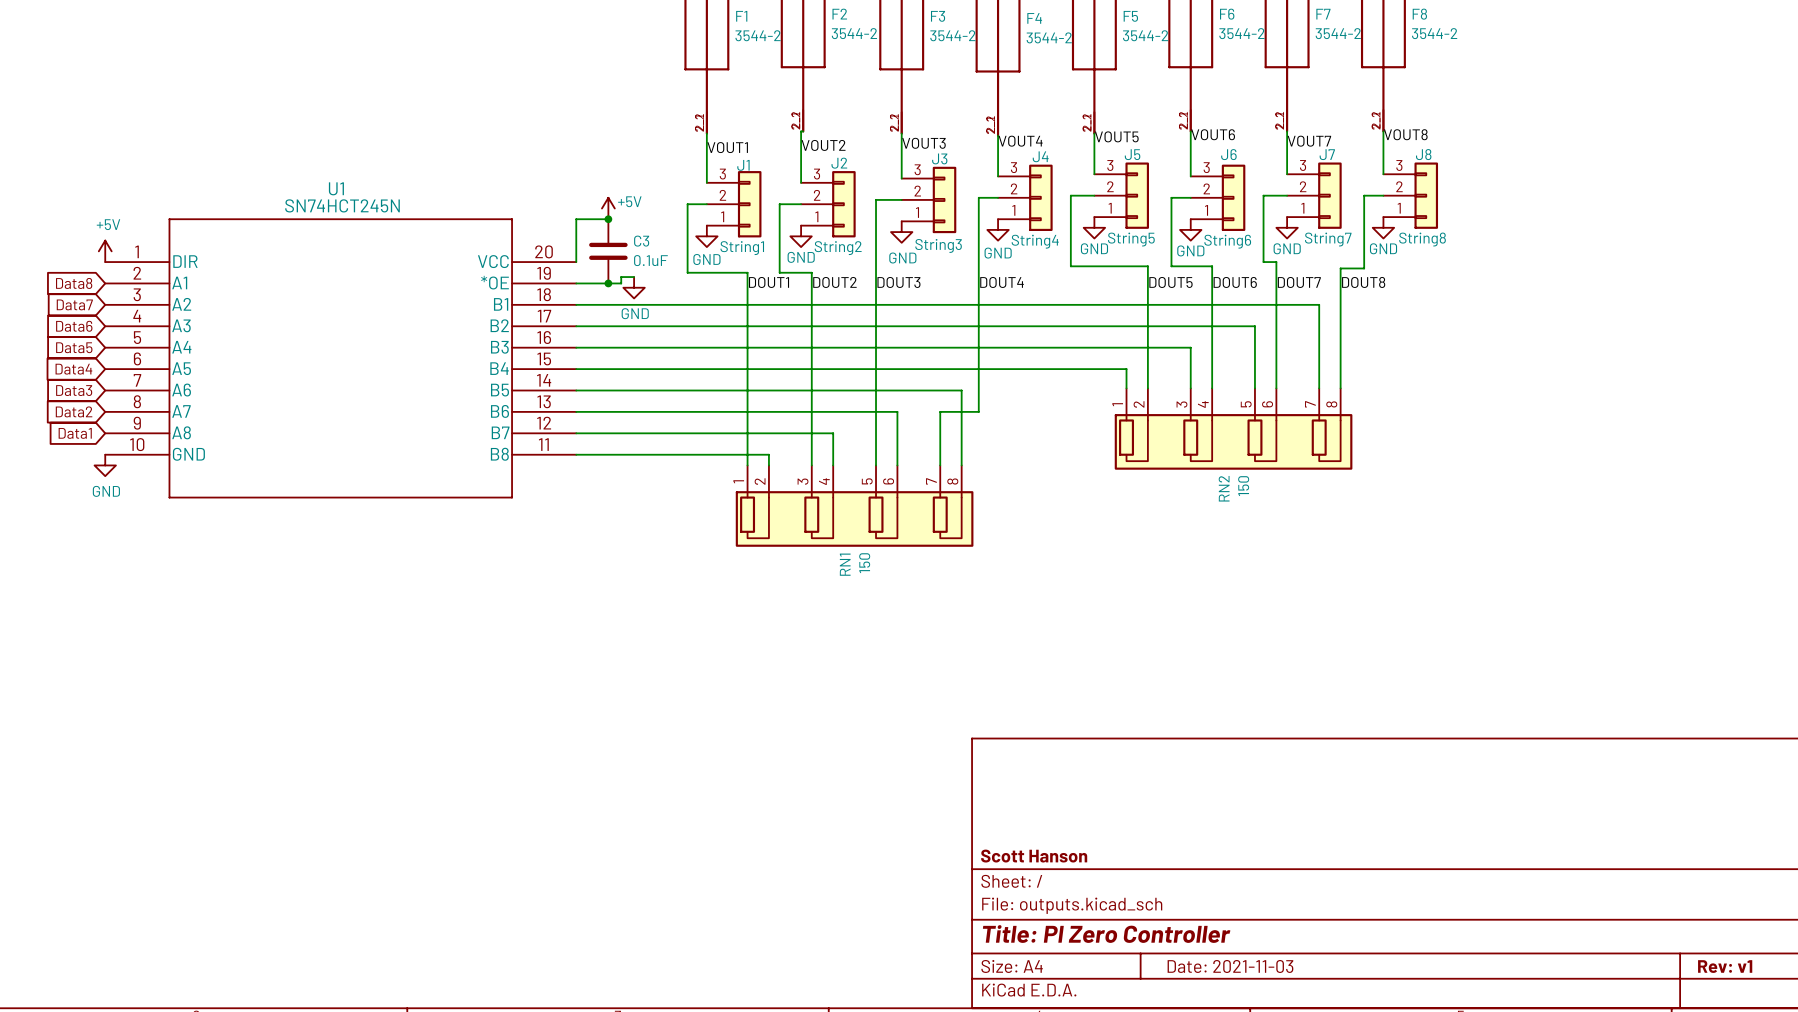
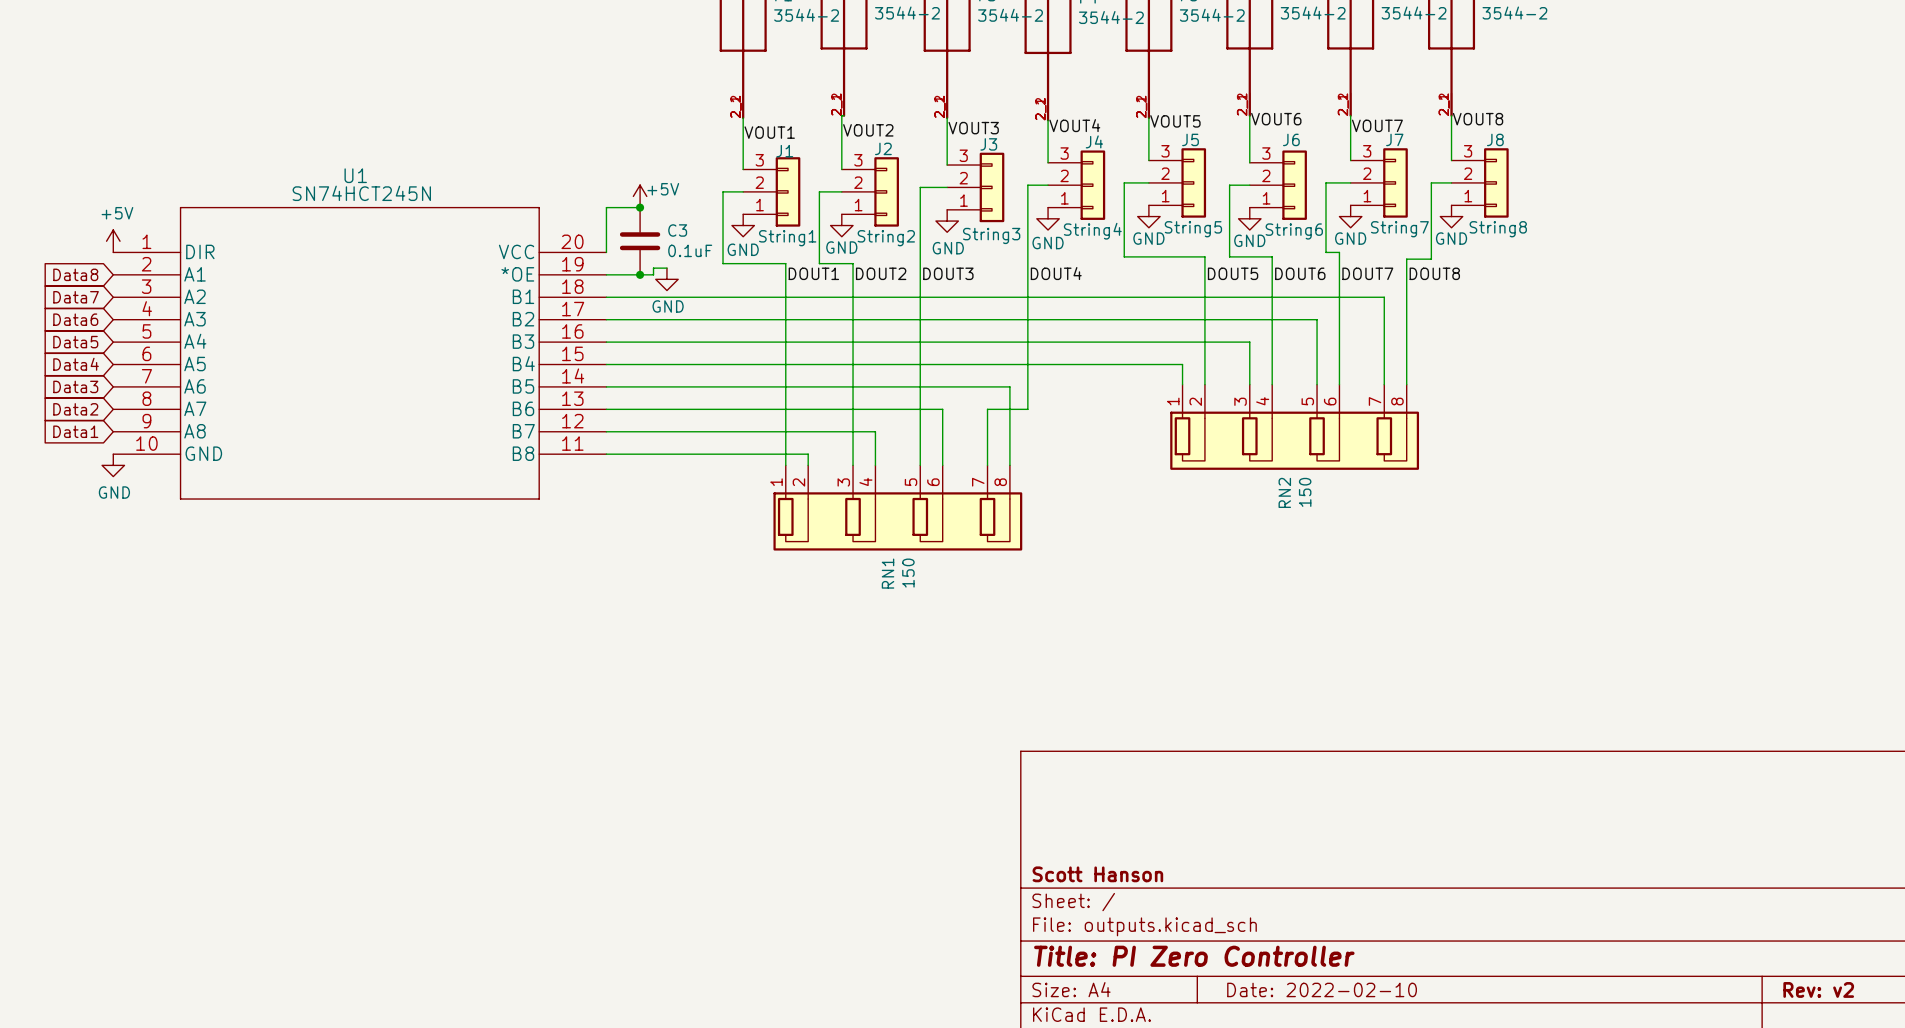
title block: Date: 2021-11-03 (1230, 966) -> Date: 2022-02-10 (1322, 989)
title block: Rev: v1 (1725, 966) -> Rev: v2 (1818, 989)

